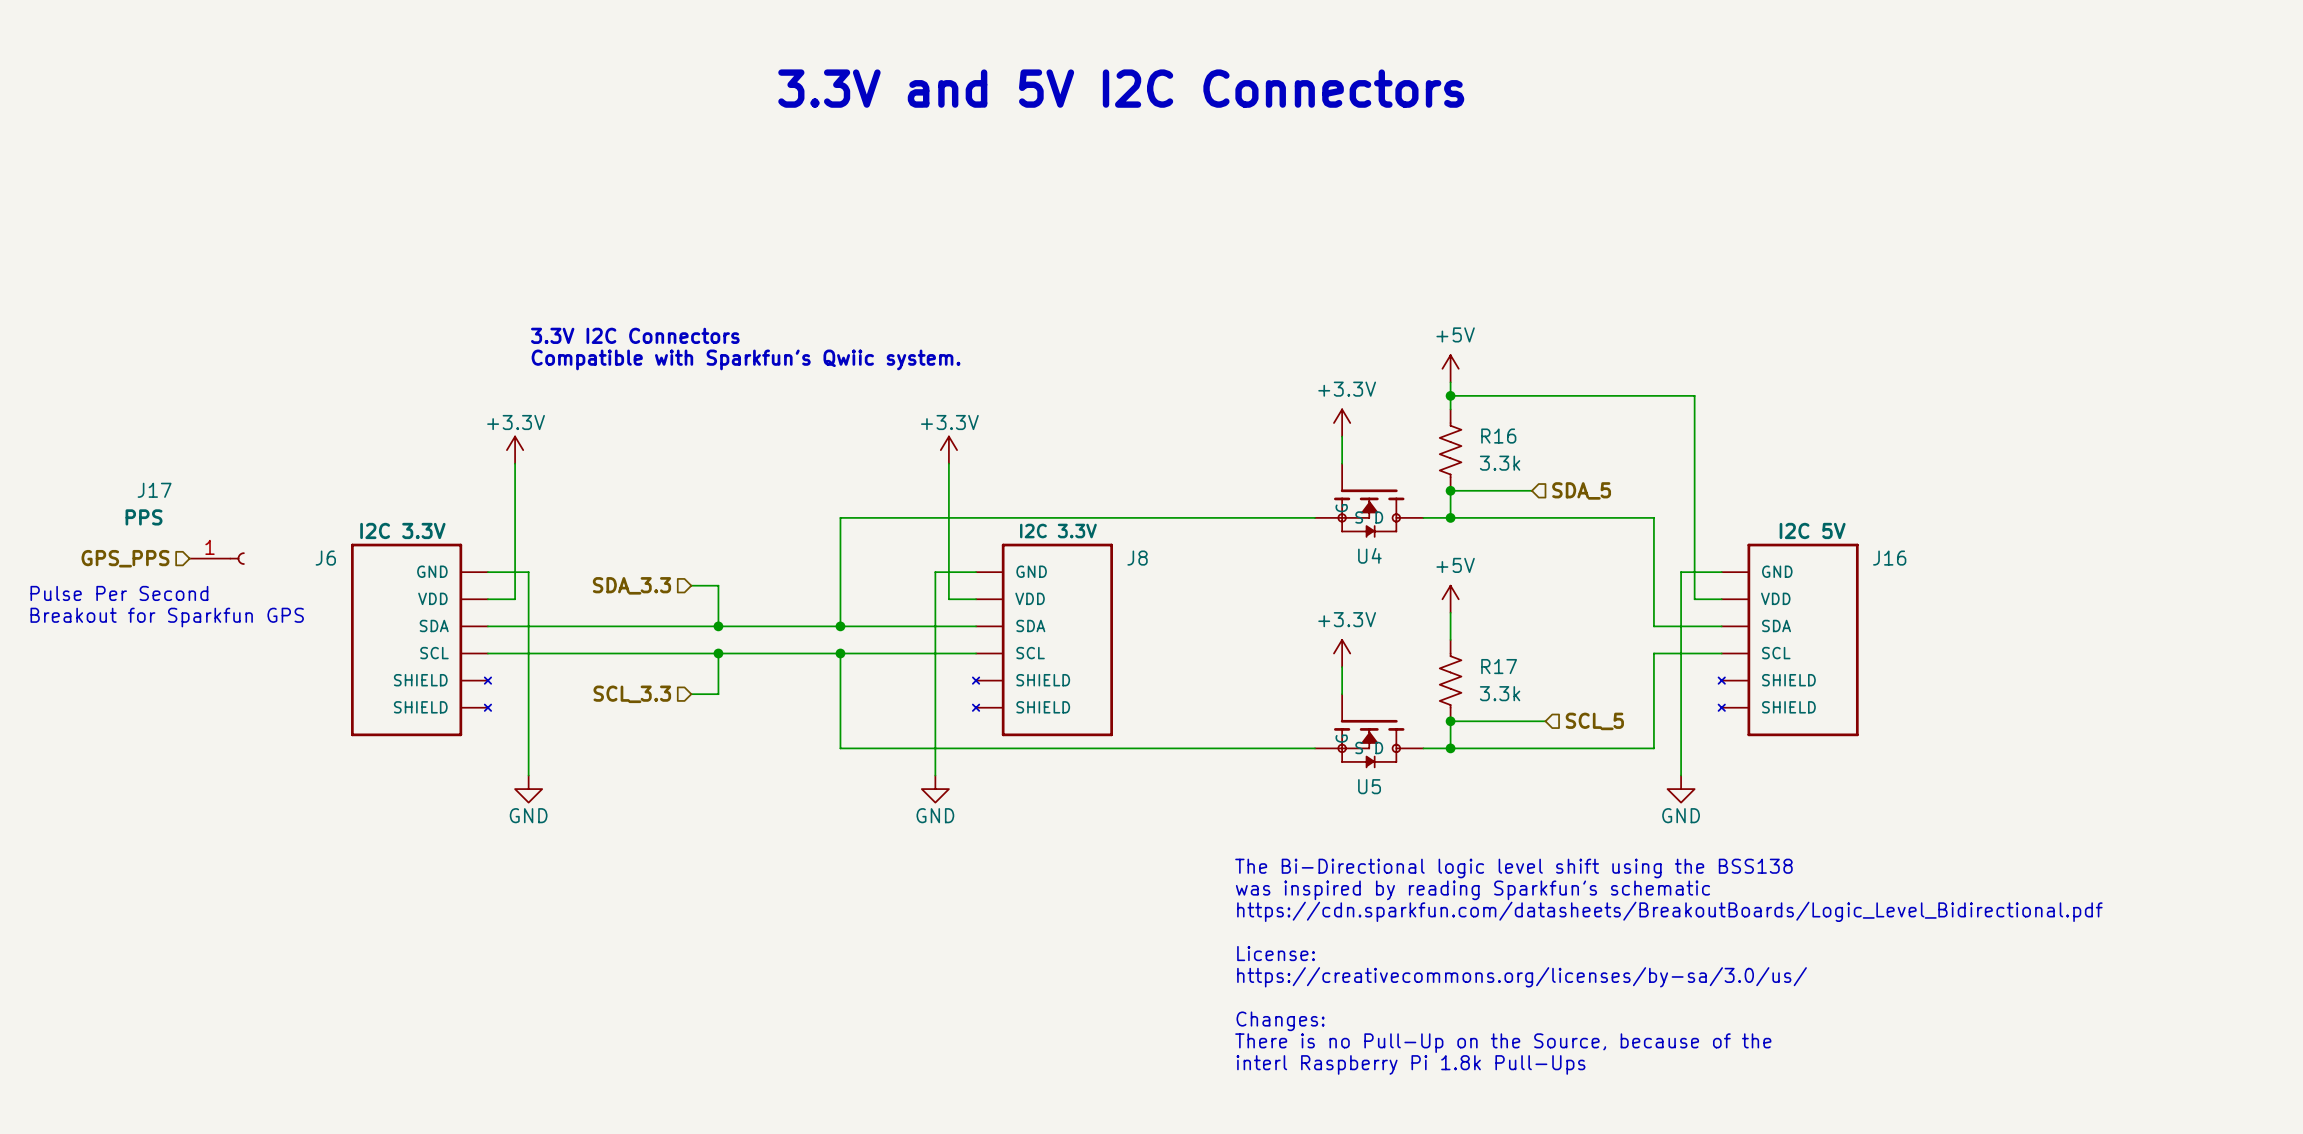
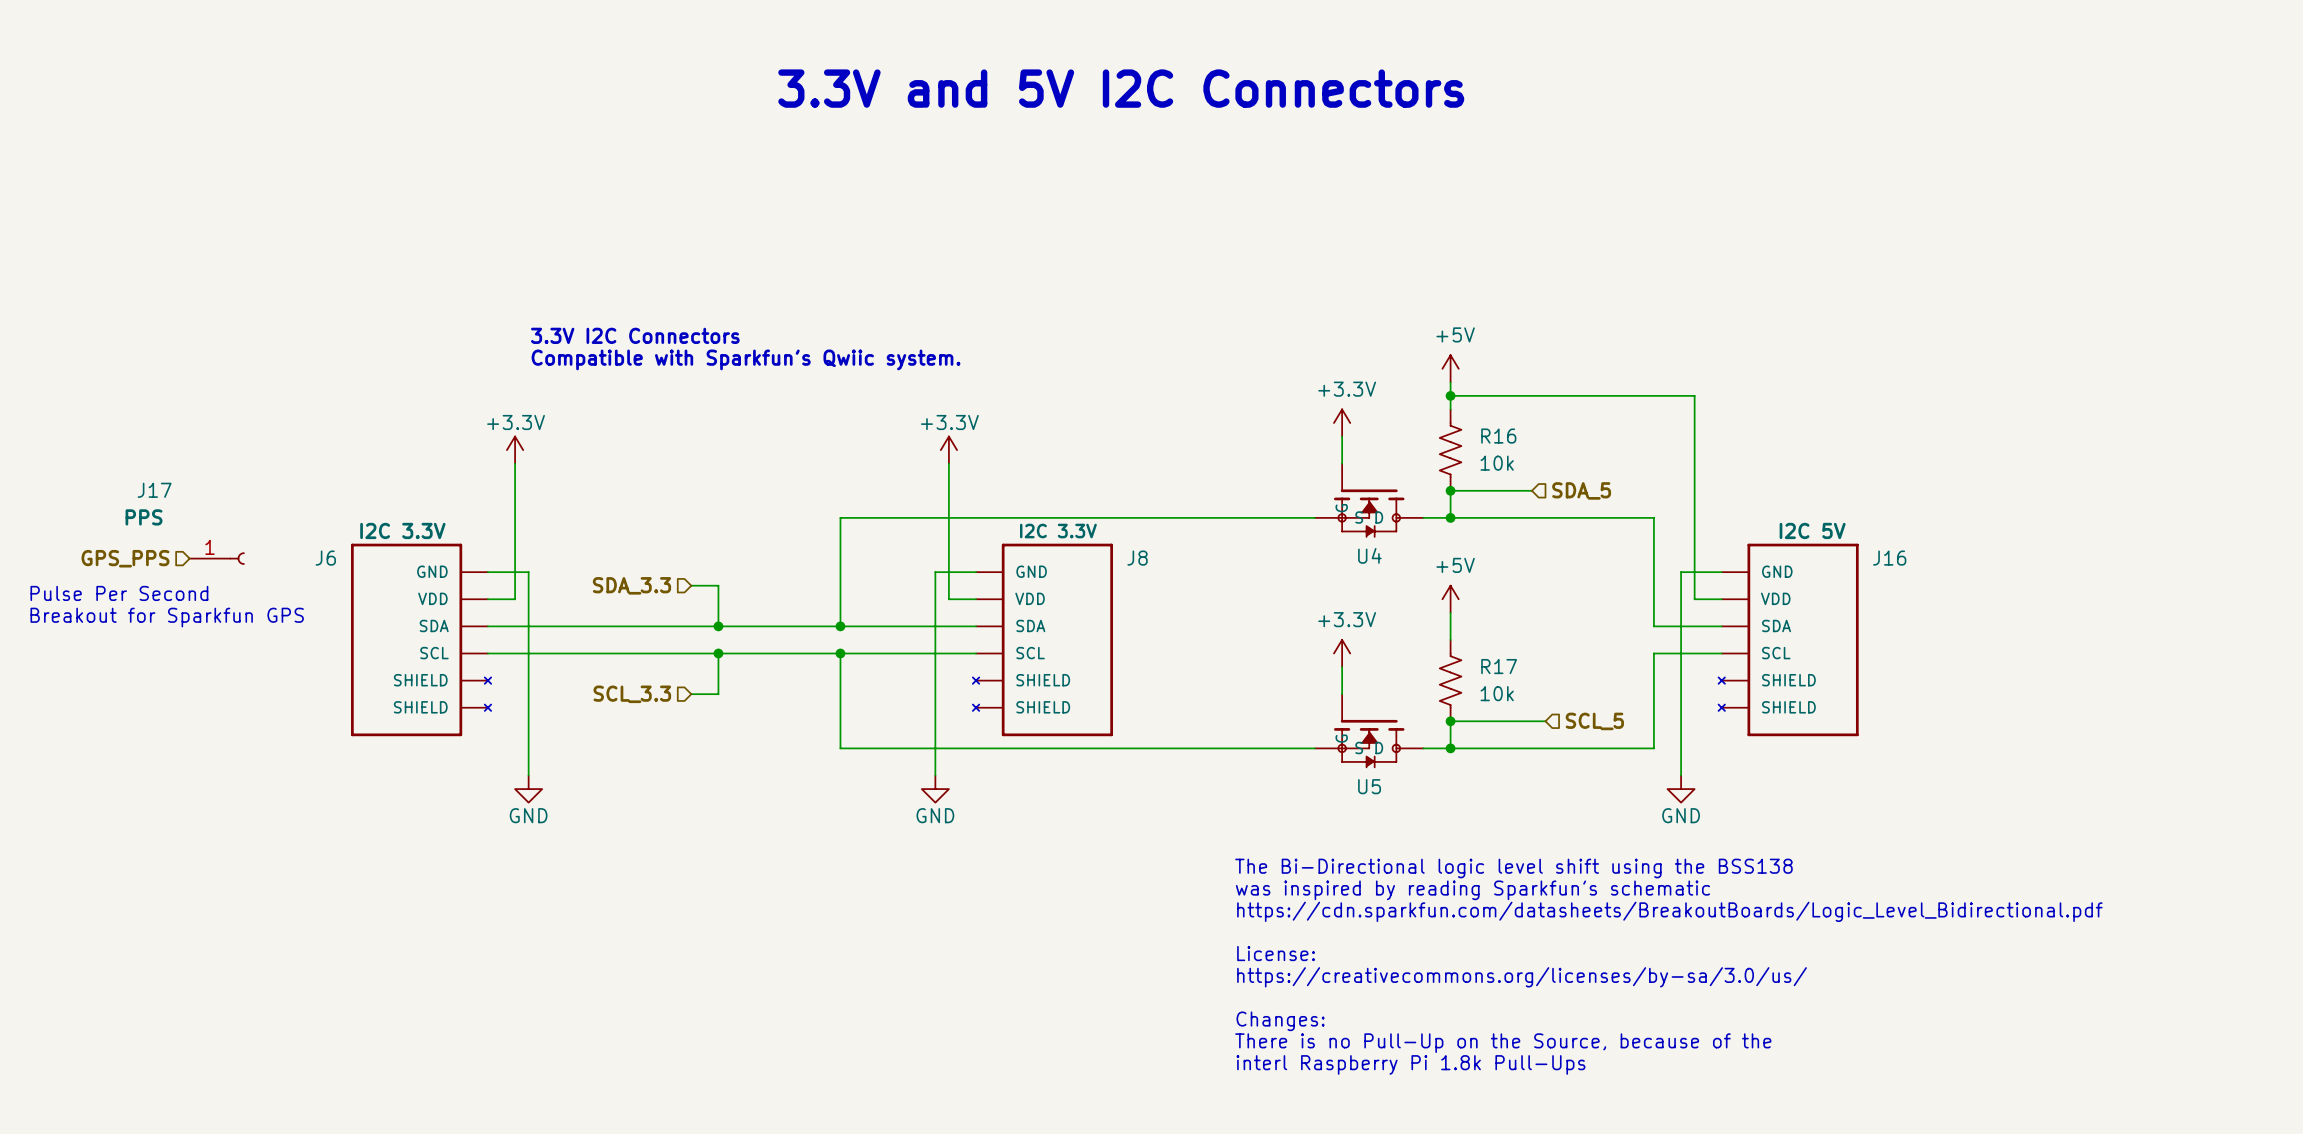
R16 value: 3.3k (1500, 463) -> 10k (1497, 463)
R17 value: 3.3k (1500, 693) -> 10k (1497, 693)

